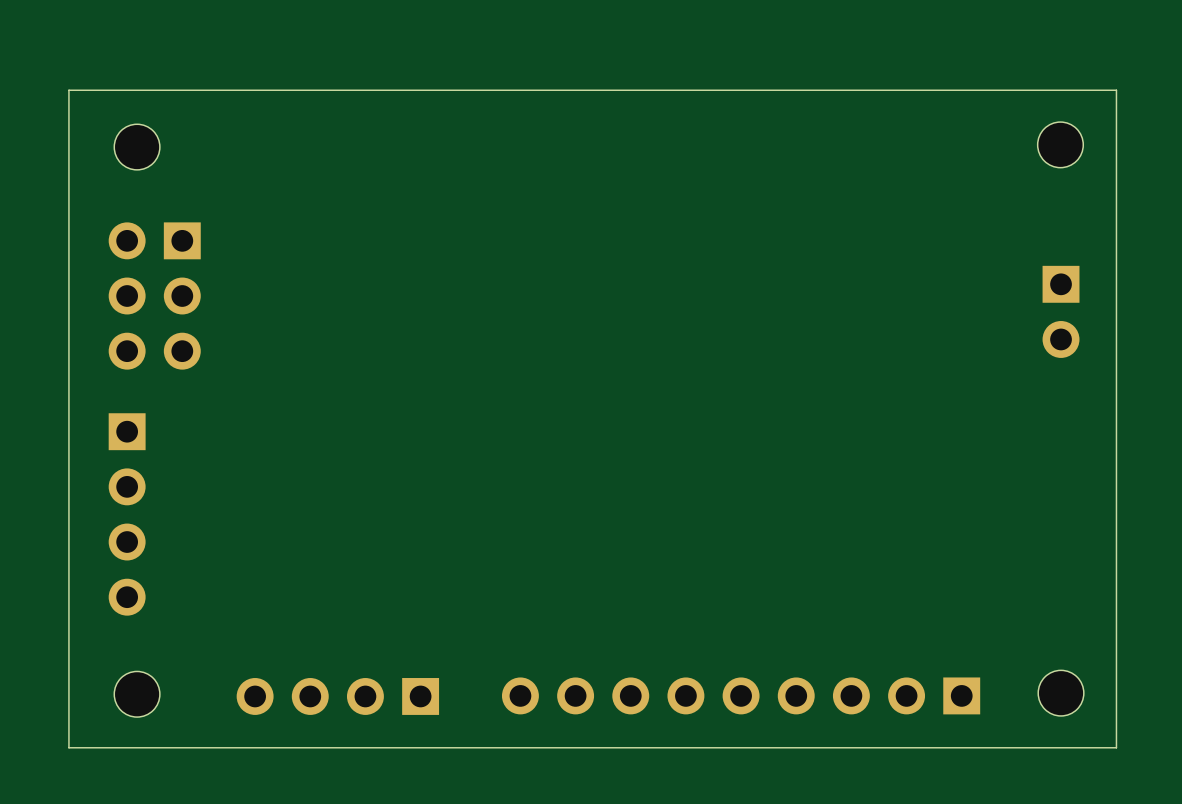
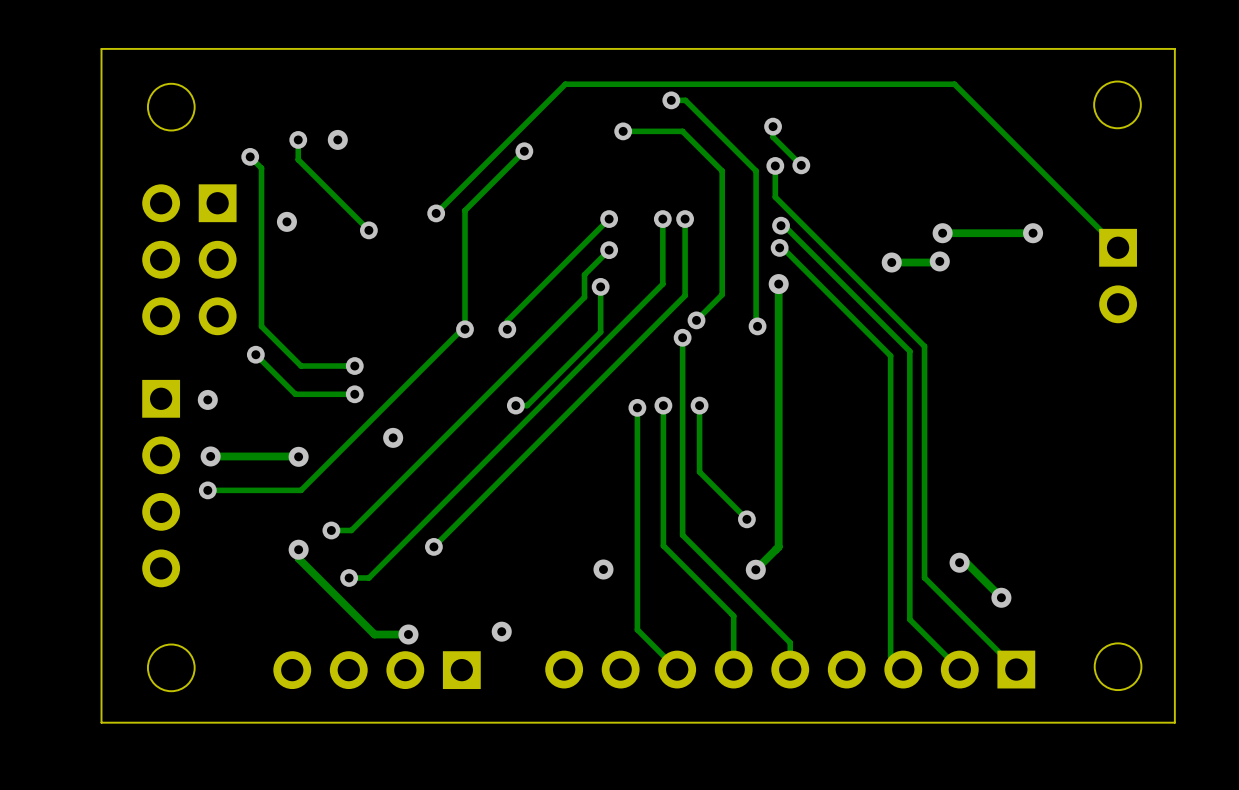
track: none -> (671, 100) (685, 100) (756, 171) (757, 326)
via: none -> (671, 100)
track: none -> (773, 126) (773, 137) (801, 165)
via: none -> (773, 126)
track: none -> (623, 131) (682, 131) (722, 171) (722, 294) (696, 320)
via: none -> (623, 131)
track: none -> (298, 139) (298, 159) (368, 230)
via: none -> (298, 139)
via: none -> (337, 139)
track: none -> (524, 151) (465, 210) (465, 329) (462, 329) (301, 490) (207, 490)
via: none -> (524, 151)
track: none -> (250, 156) (261, 168) (261, 326) (301, 366) (354, 366)
via: none -> (250, 156)
via: none -> (801, 165)
track: none -> (775, 165) (775, 197) (924, 346) (924, 577) (1016, 669)
via: none -> (775, 165)
track: none -> (436, 213) (565, 84) (954, 84) (1118, 247)
via: none -> (436, 213)
track: none -> (609, 219) (507, 320) (507, 329)
via: none -> (609, 219)
track: none -> (662, 219) (662, 284) (368, 577) (349, 577)
via: none -> (662, 219)
track: none -> (685, 219) (685, 295) (433, 546)
via: none -> (685, 219)
via: none -> (286, 221)
track: none -> (781, 225) (784, 225) (909, 351) (909, 619) (959, 669)
via: none -> (781, 225)
via: none -> (368, 230)
via: none -> (942, 233)
track: none -> (1033, 233) (942, 233)
via: none -> (1033, 233)
track: none -> (779, 247) (782, 247) (890, 355) (890, 656) (903, 669)
via: none -> (779, 247)
track: none -> (609, 250) (584, 274) (584, 297) (351, 530) (331, 530)
via: none -> (609, 250)
track: none -> (939, 261) (891, 262)
via: none -> (939, 261)
via: none -> (891, 262)
track: none -> (778, 284) (778, 546) (755, 569)
via: none -> (778, 284)
track: none -> (600, 286) (600, 332) (527, 405) (515, 405)
via: none -> (600, 286)
via: none -> (696, 320)
via: none -> (757, 326)
via: none -> (465, 329)
via: none -> (507, 329)
track: none -> (682, 337) (682, 535) (790, 642) (790, 669)
via: none -> (682, 337)
track: none -> (255, 354) (295, 394) (354, 394)
via: none -> (255, 354)
via: none -> (354, 366)
via: none -> (354, 394)
via: none -> (207, 399)
via: none -> (515, 405)
track: none -> (663, 405) (663, 545) (733, 616) (733, 669)
via: none -> (663, 405)
track: none -> (699, 405) (699, 471) (746, 519)
via: none -> (699, 405)
track: none -> (637, 407) (637, 629) (677, 669)
via: none -> (637, 407)
via: none -> (393, 437)
track: none -> (210, 456) (298, 456)
via: none -> (210, 456)
via: none -> (298, 456)
via: none -> (207, 490)
via: none -> (746, 519)
via: none -> (331, 530)
via: none -> (433, 546)
track: none -> (298, 549) (298, 558) (374, 634) (408, 634)
via: none -> (298, 549)
track: none -> (959, 562) (966, 562) (1001, 597)
via: none -> (959, 562)
via: none -> (603, 569)
via: none -> (755, 569)
via: none -> (349, 577)
via: none -> (1001, 597)
via: none -> (501, 631)
via: none -> (408, 634)

